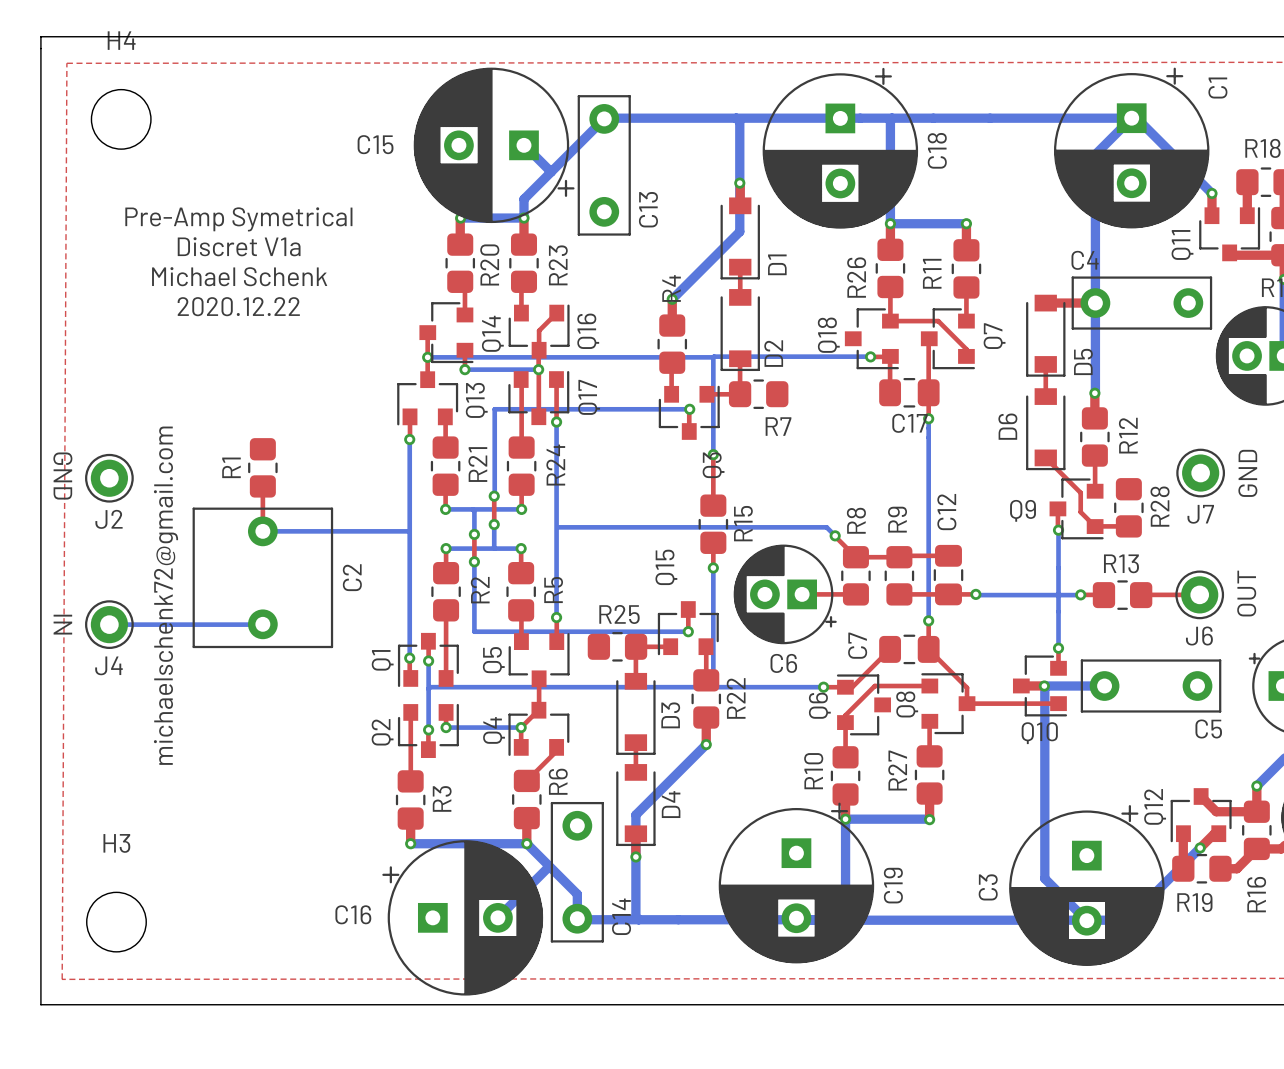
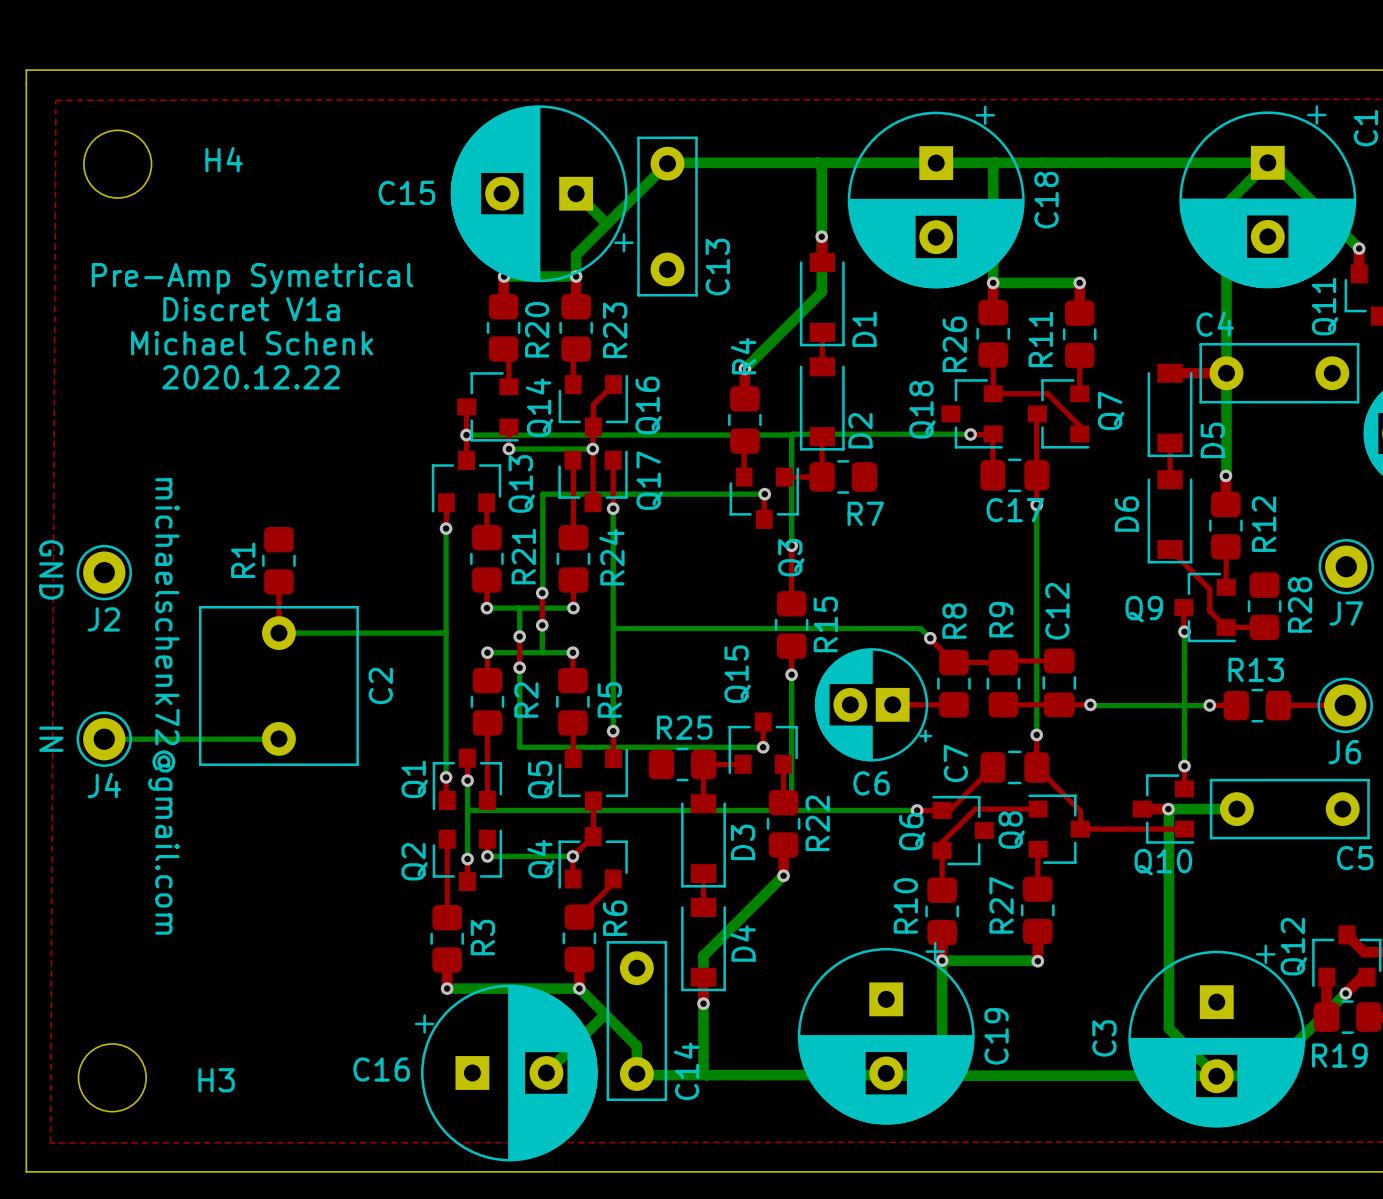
H4 name position: H4 (121, 40) -> H4 (224, 159)
text rotation: 0° (165, 595) -> 180° (163, 706)
H3 name position: H3 (116, 843) -> H3 (216, 1080)

